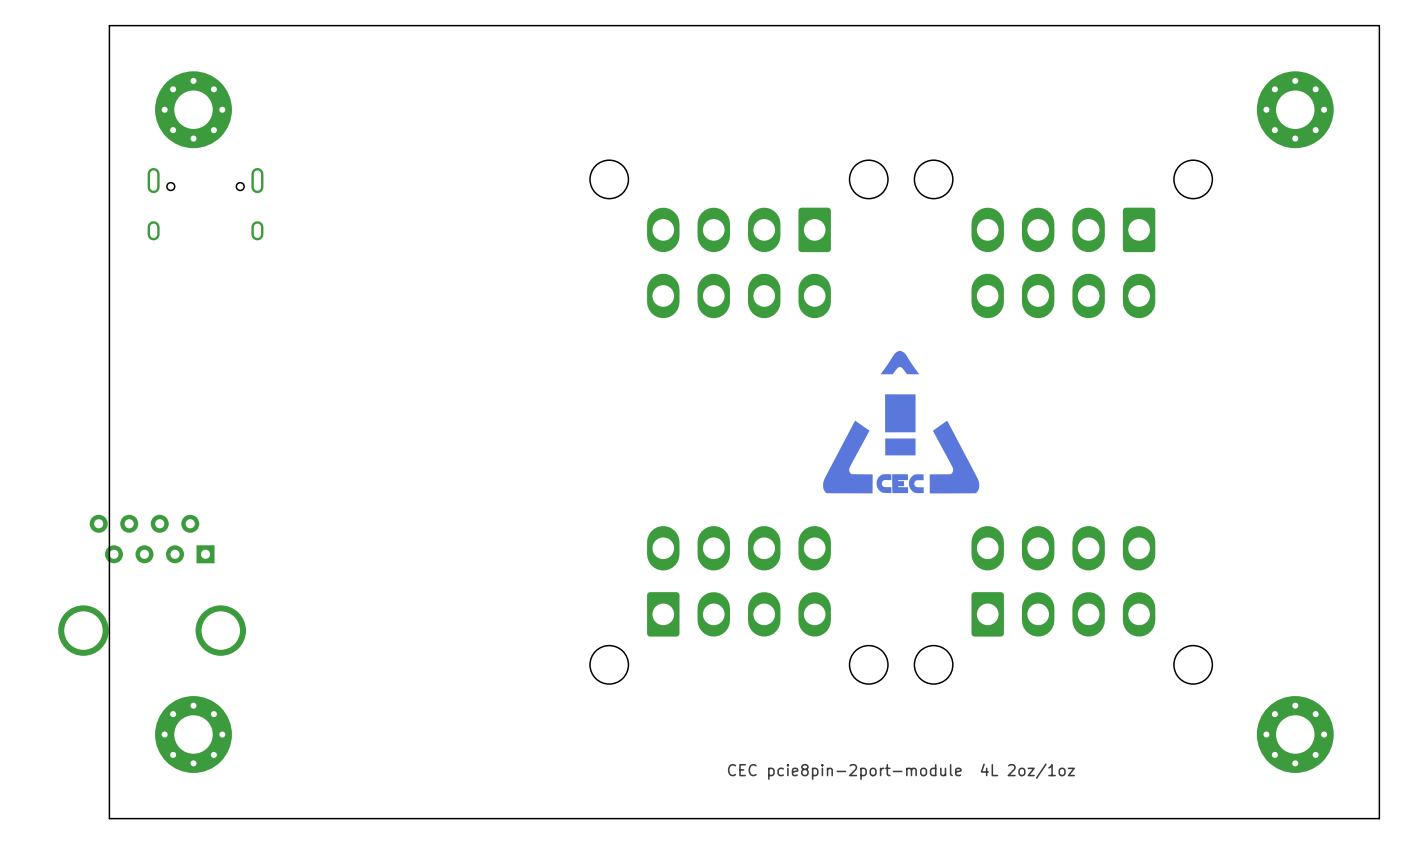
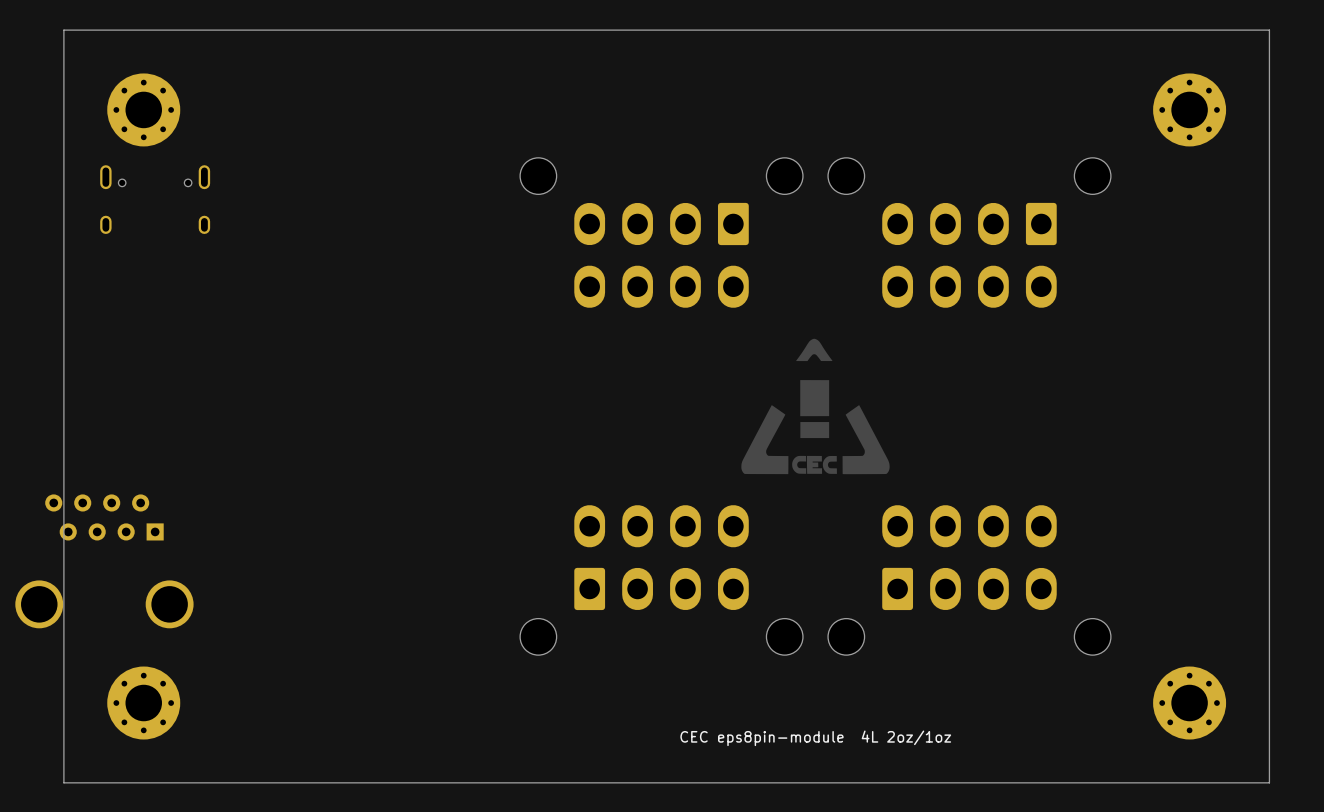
text: CEC pcie8pin-2port-module 4L 2oz/1oz (901, 771) -> CEC eps8pin-module 4L 2oz/1oz (815, 738)

